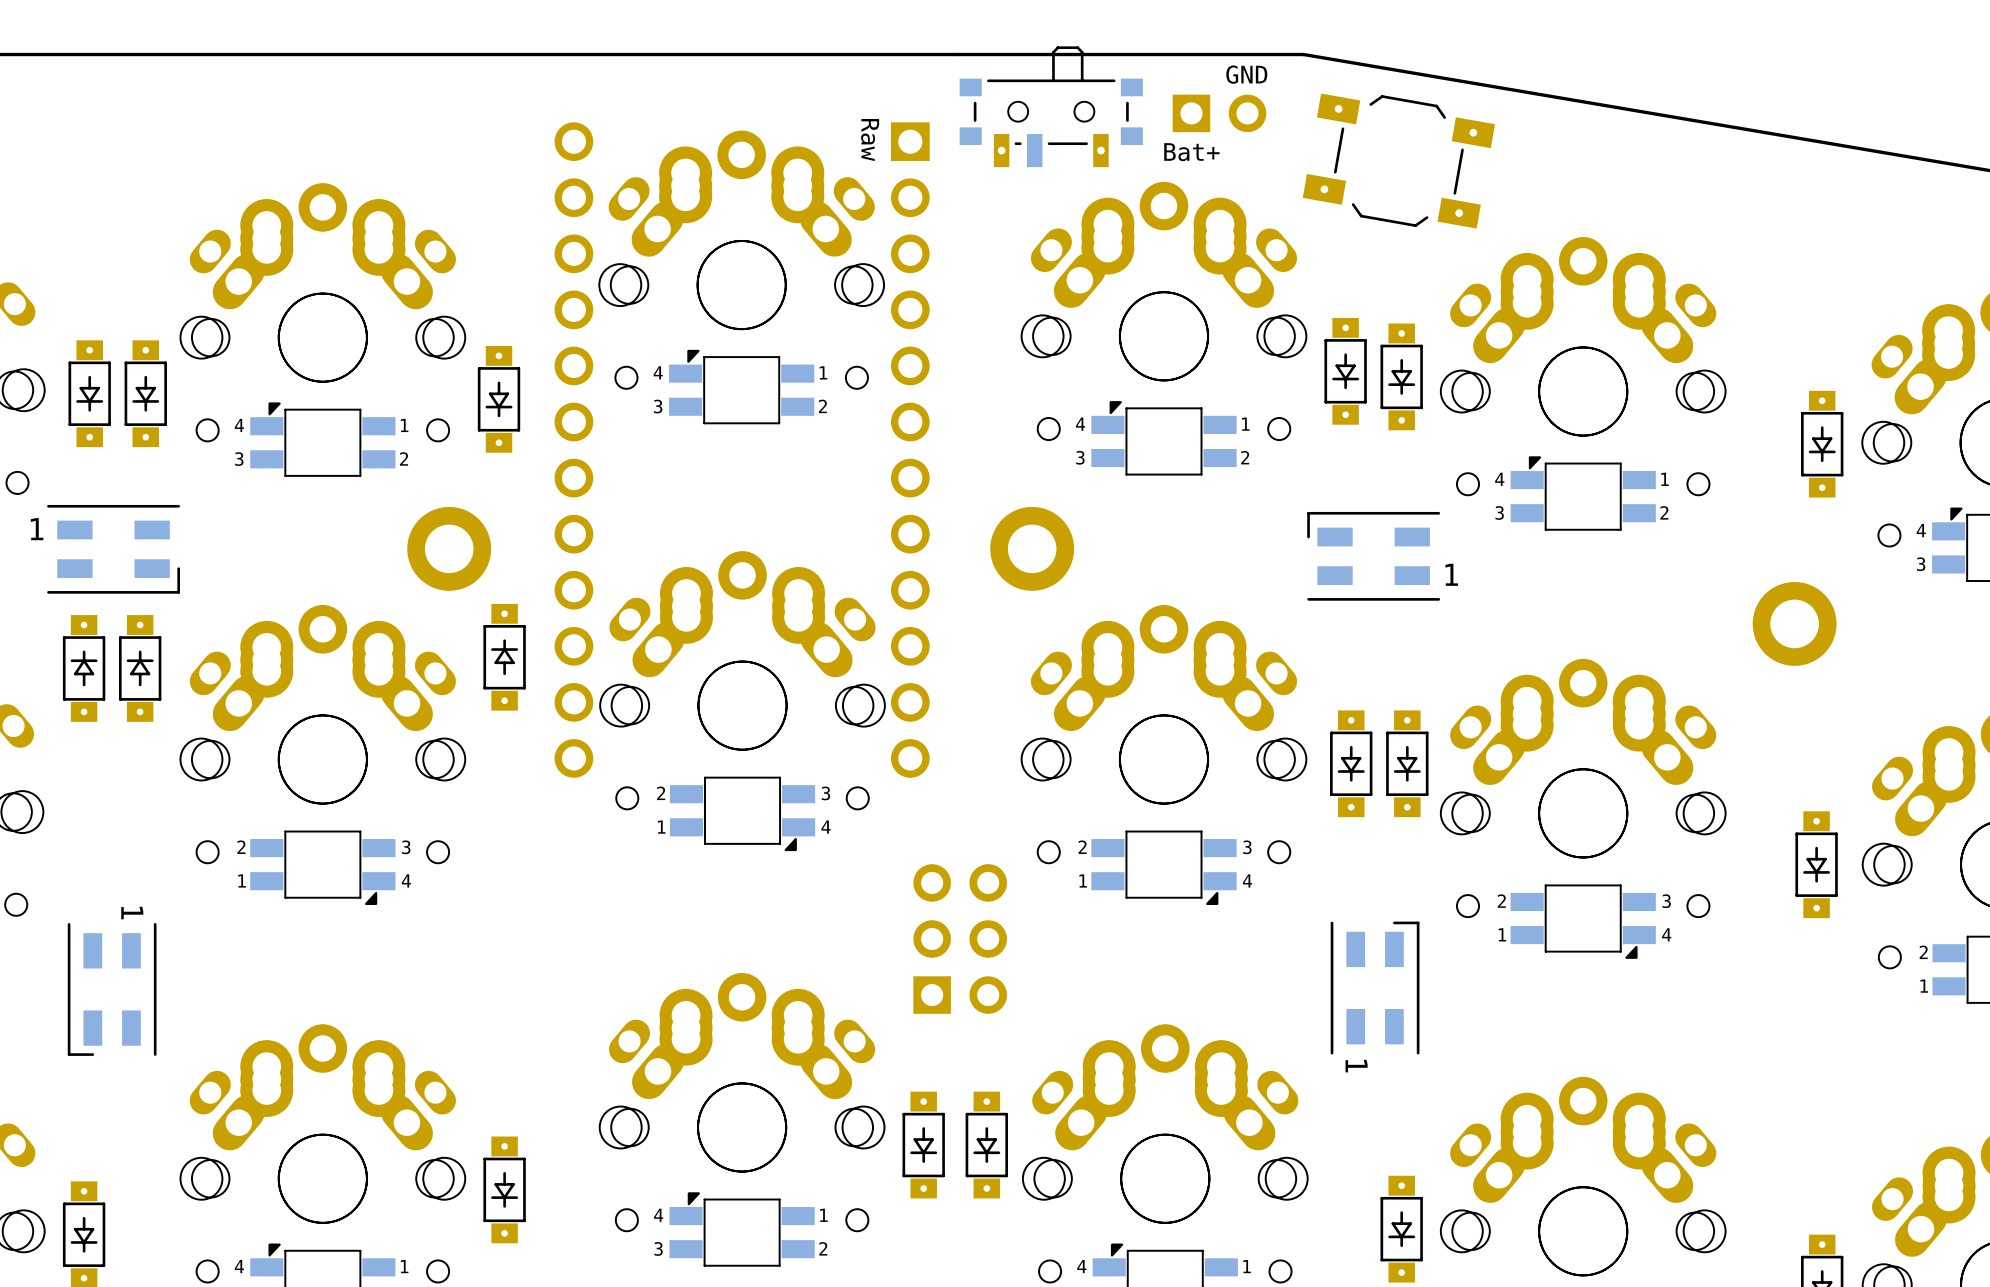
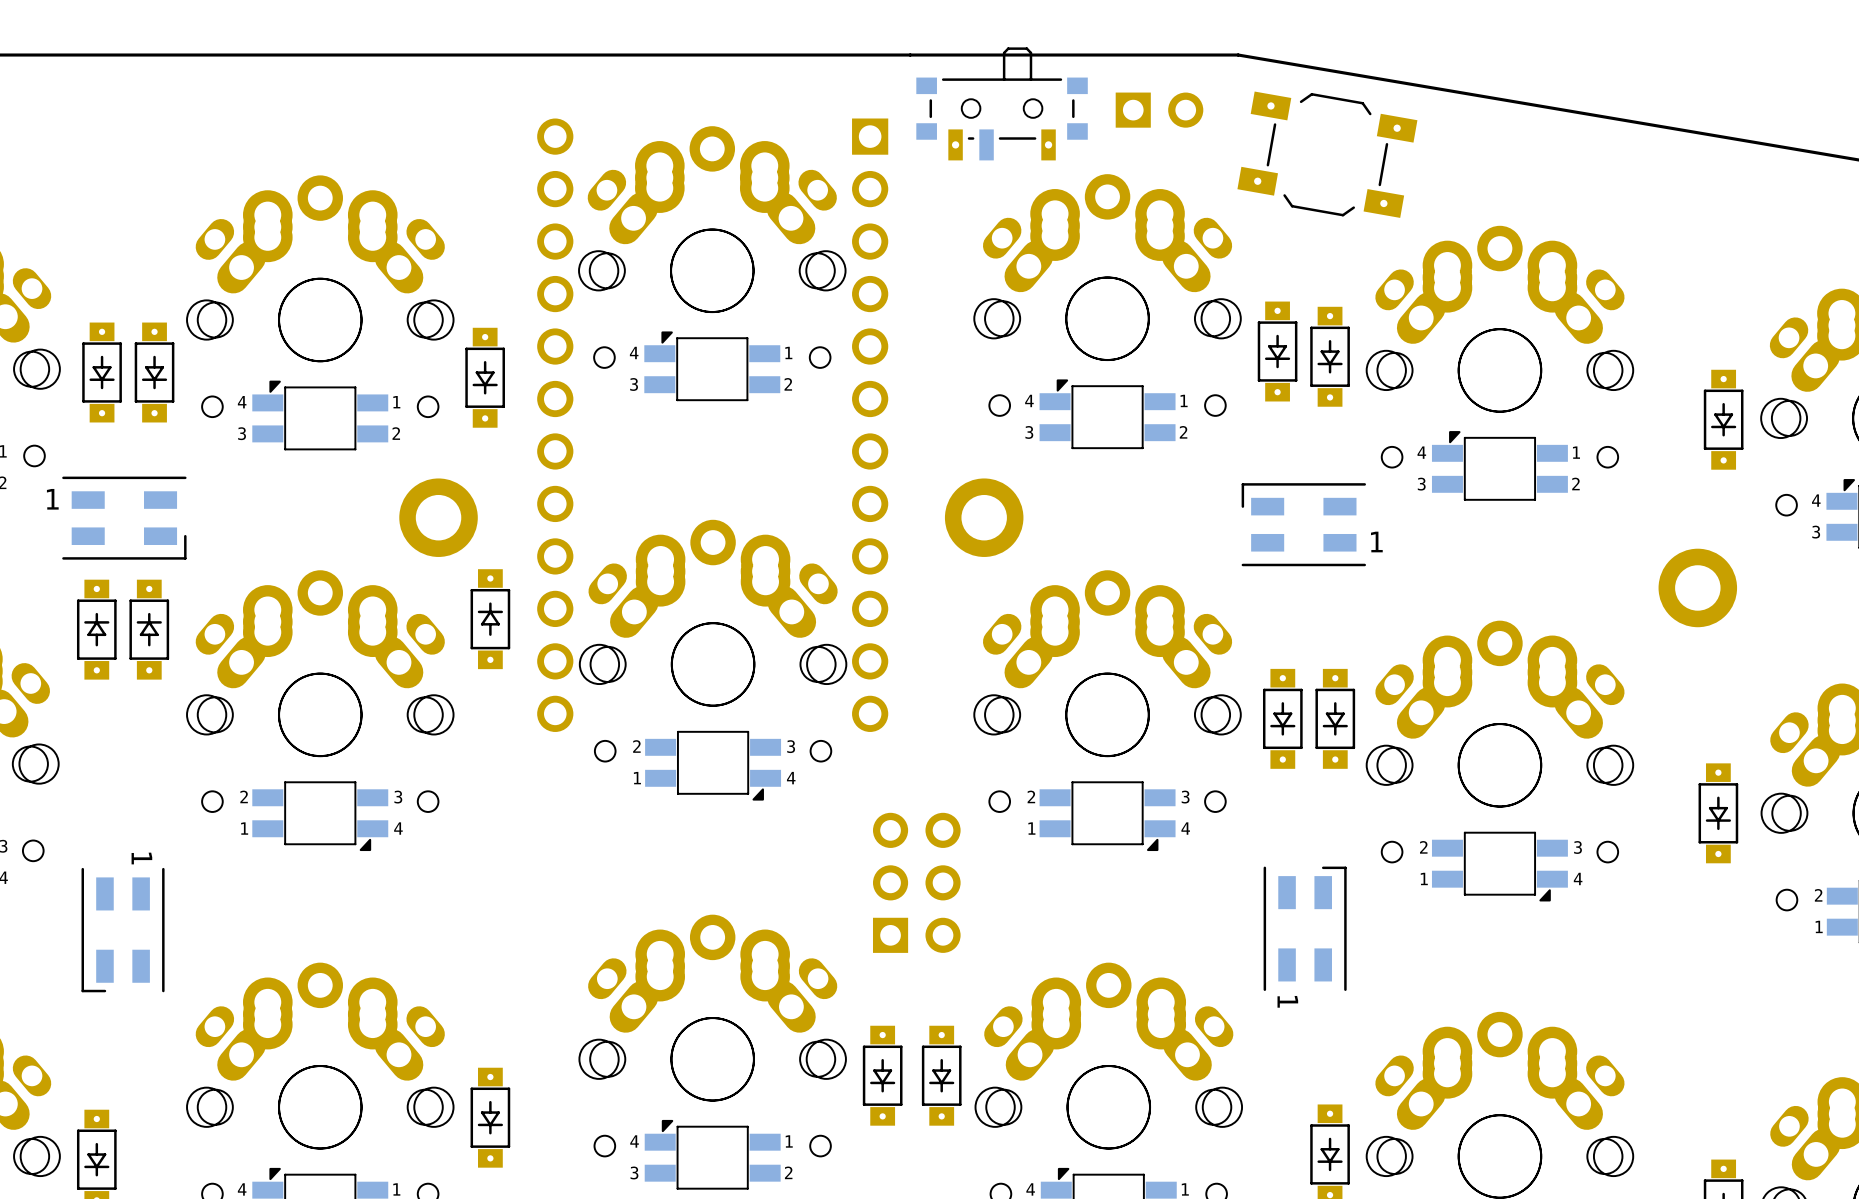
text: GND (1246, 74) -> none
text: Raw (870, 140) -> none
text: Bat+ (1191, 152) -> none

